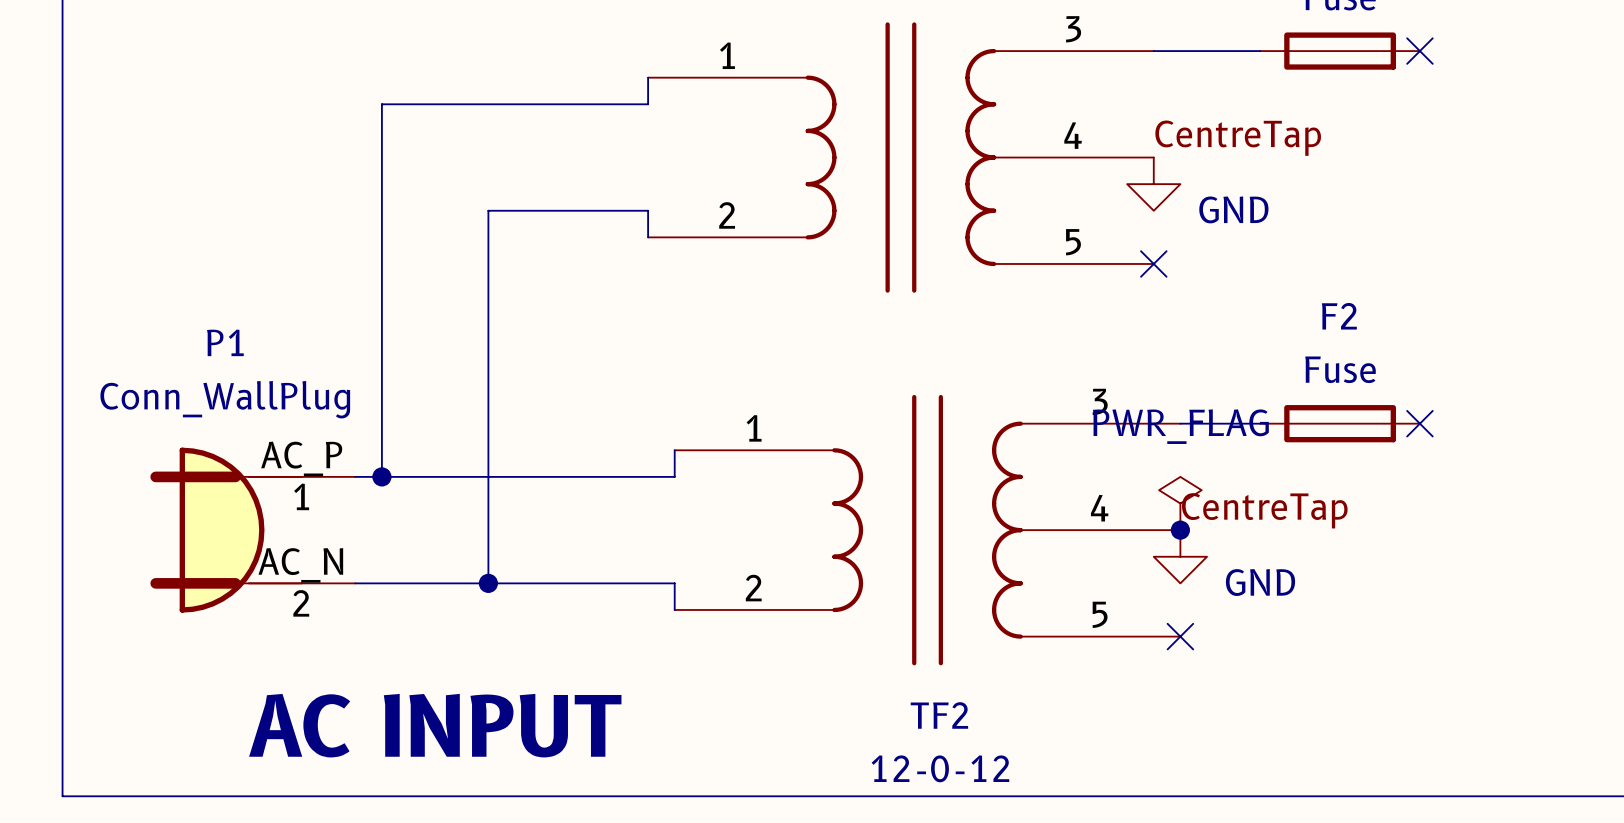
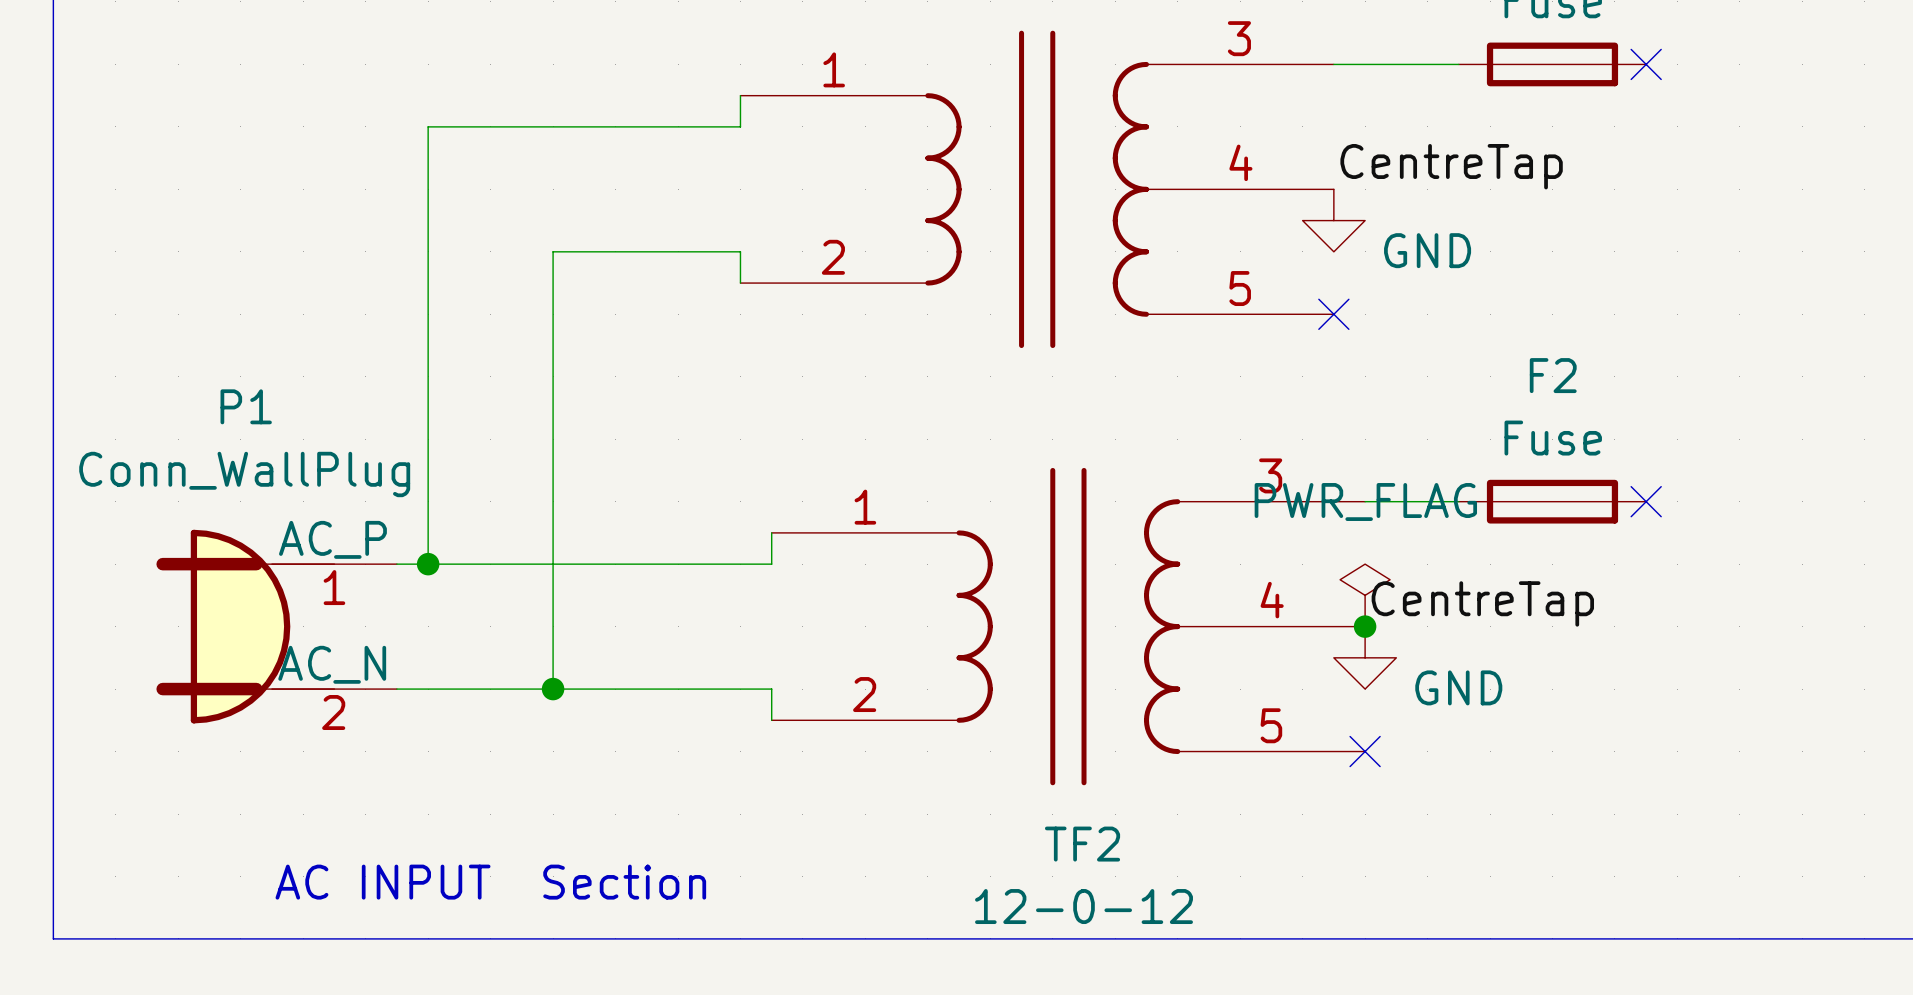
text: AC INPUT (435, 725) -> AC INPUT Section (490, 882)

